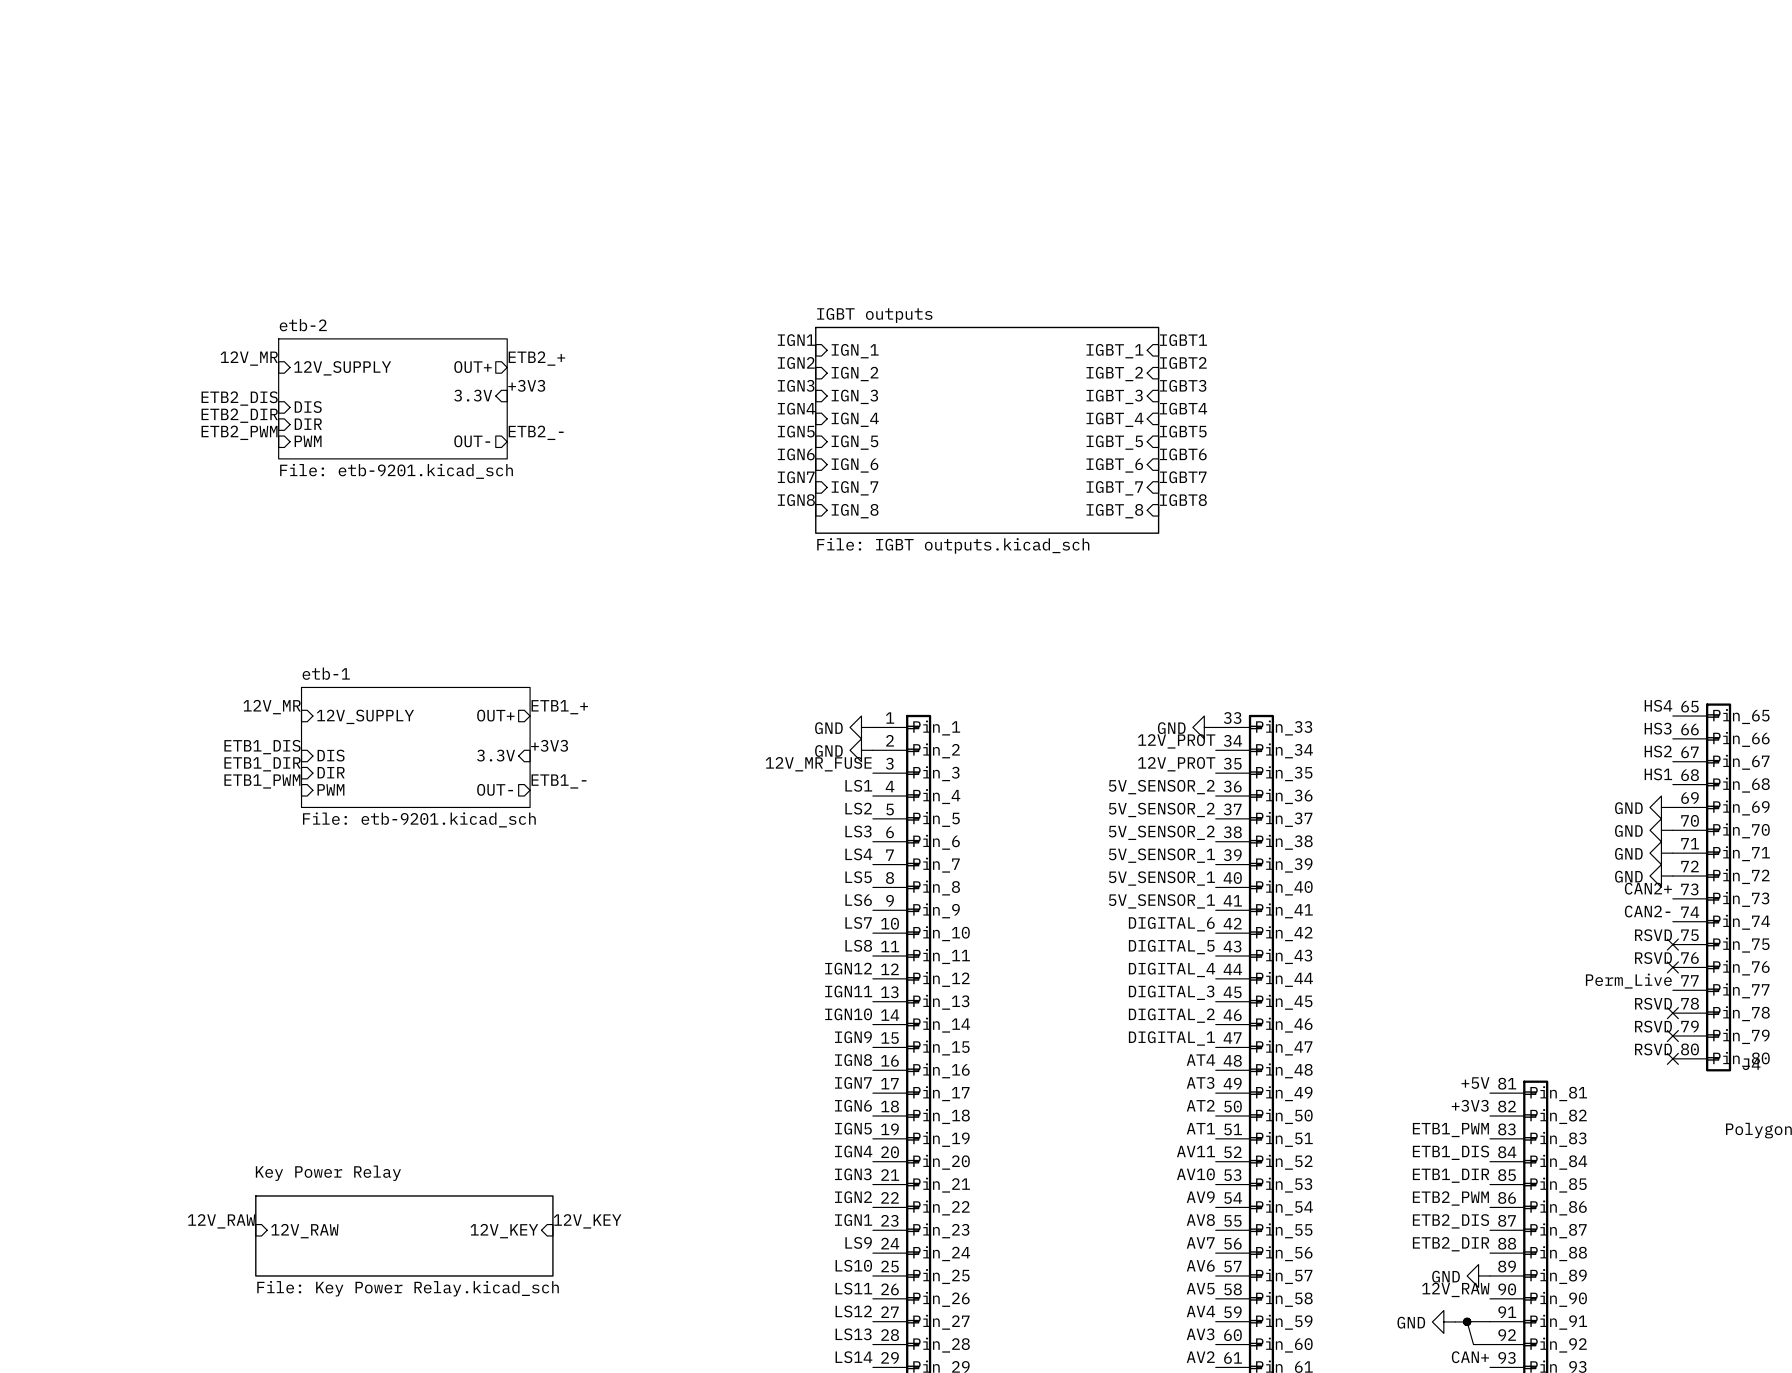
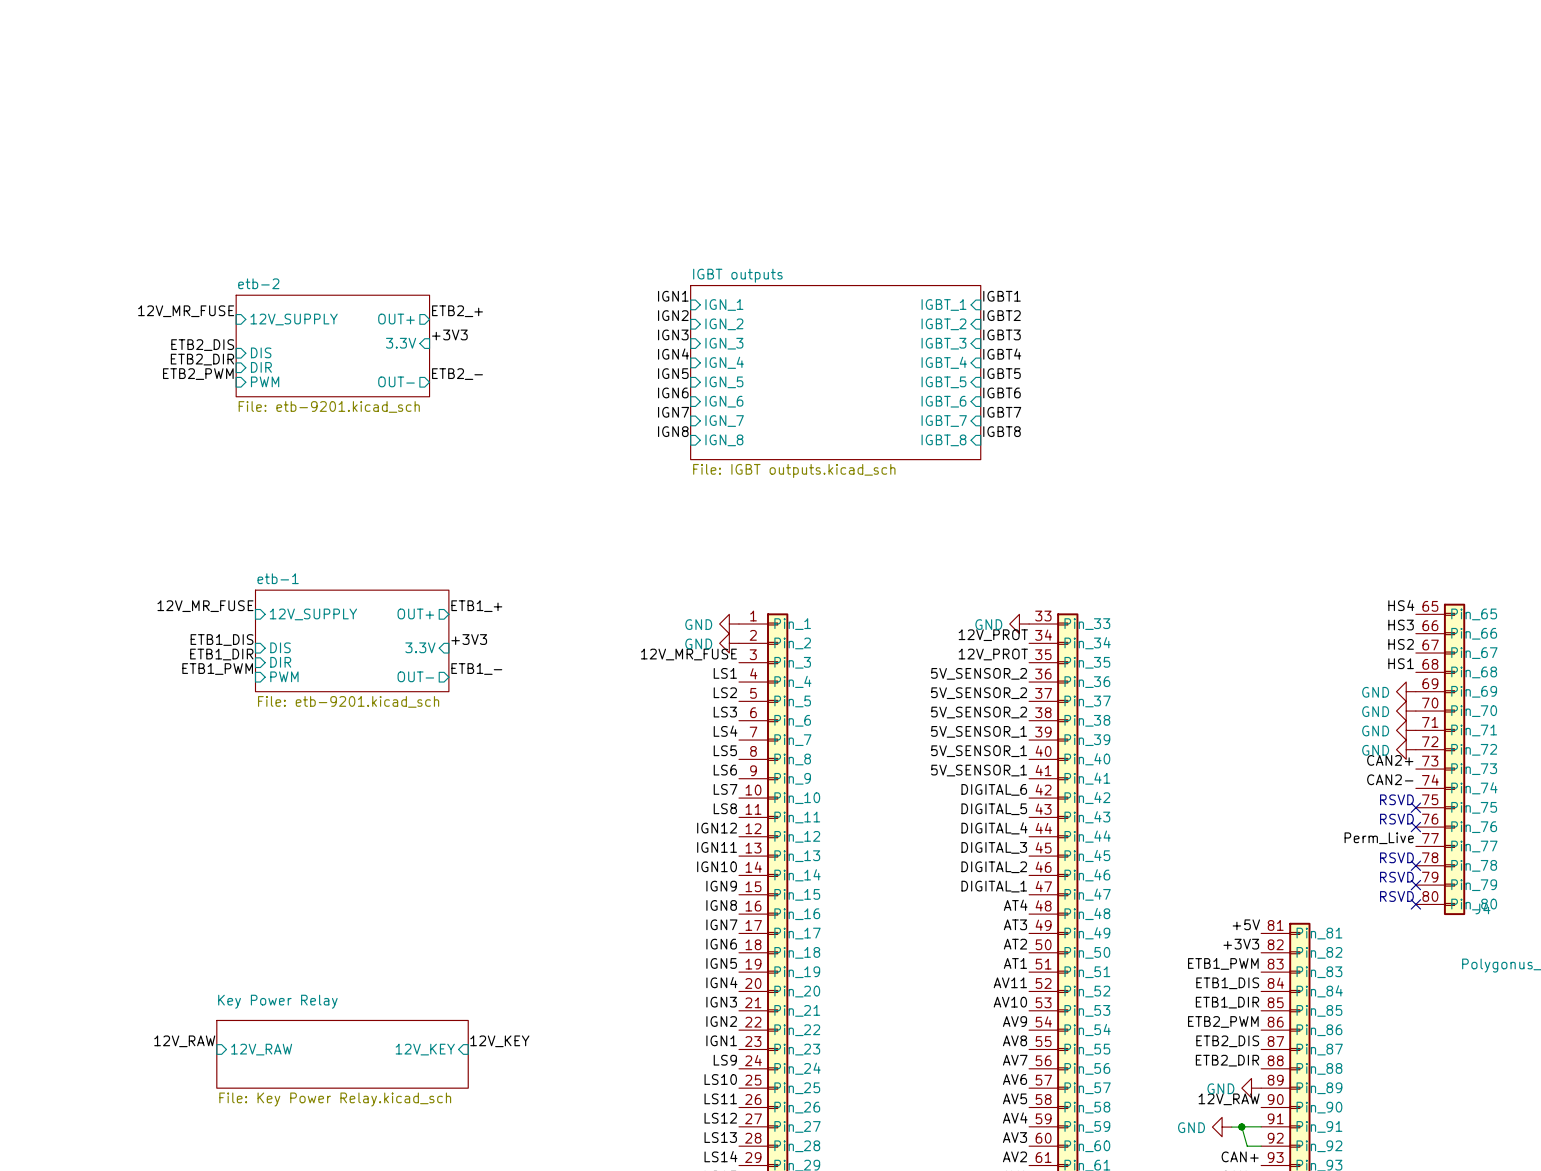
label: 12V_MR (249, 358) -> 12V_MR_FUSE (186, 311)
label: 12V_MR (272, 707) -> 12V_MR_FUSE (205, 606)

